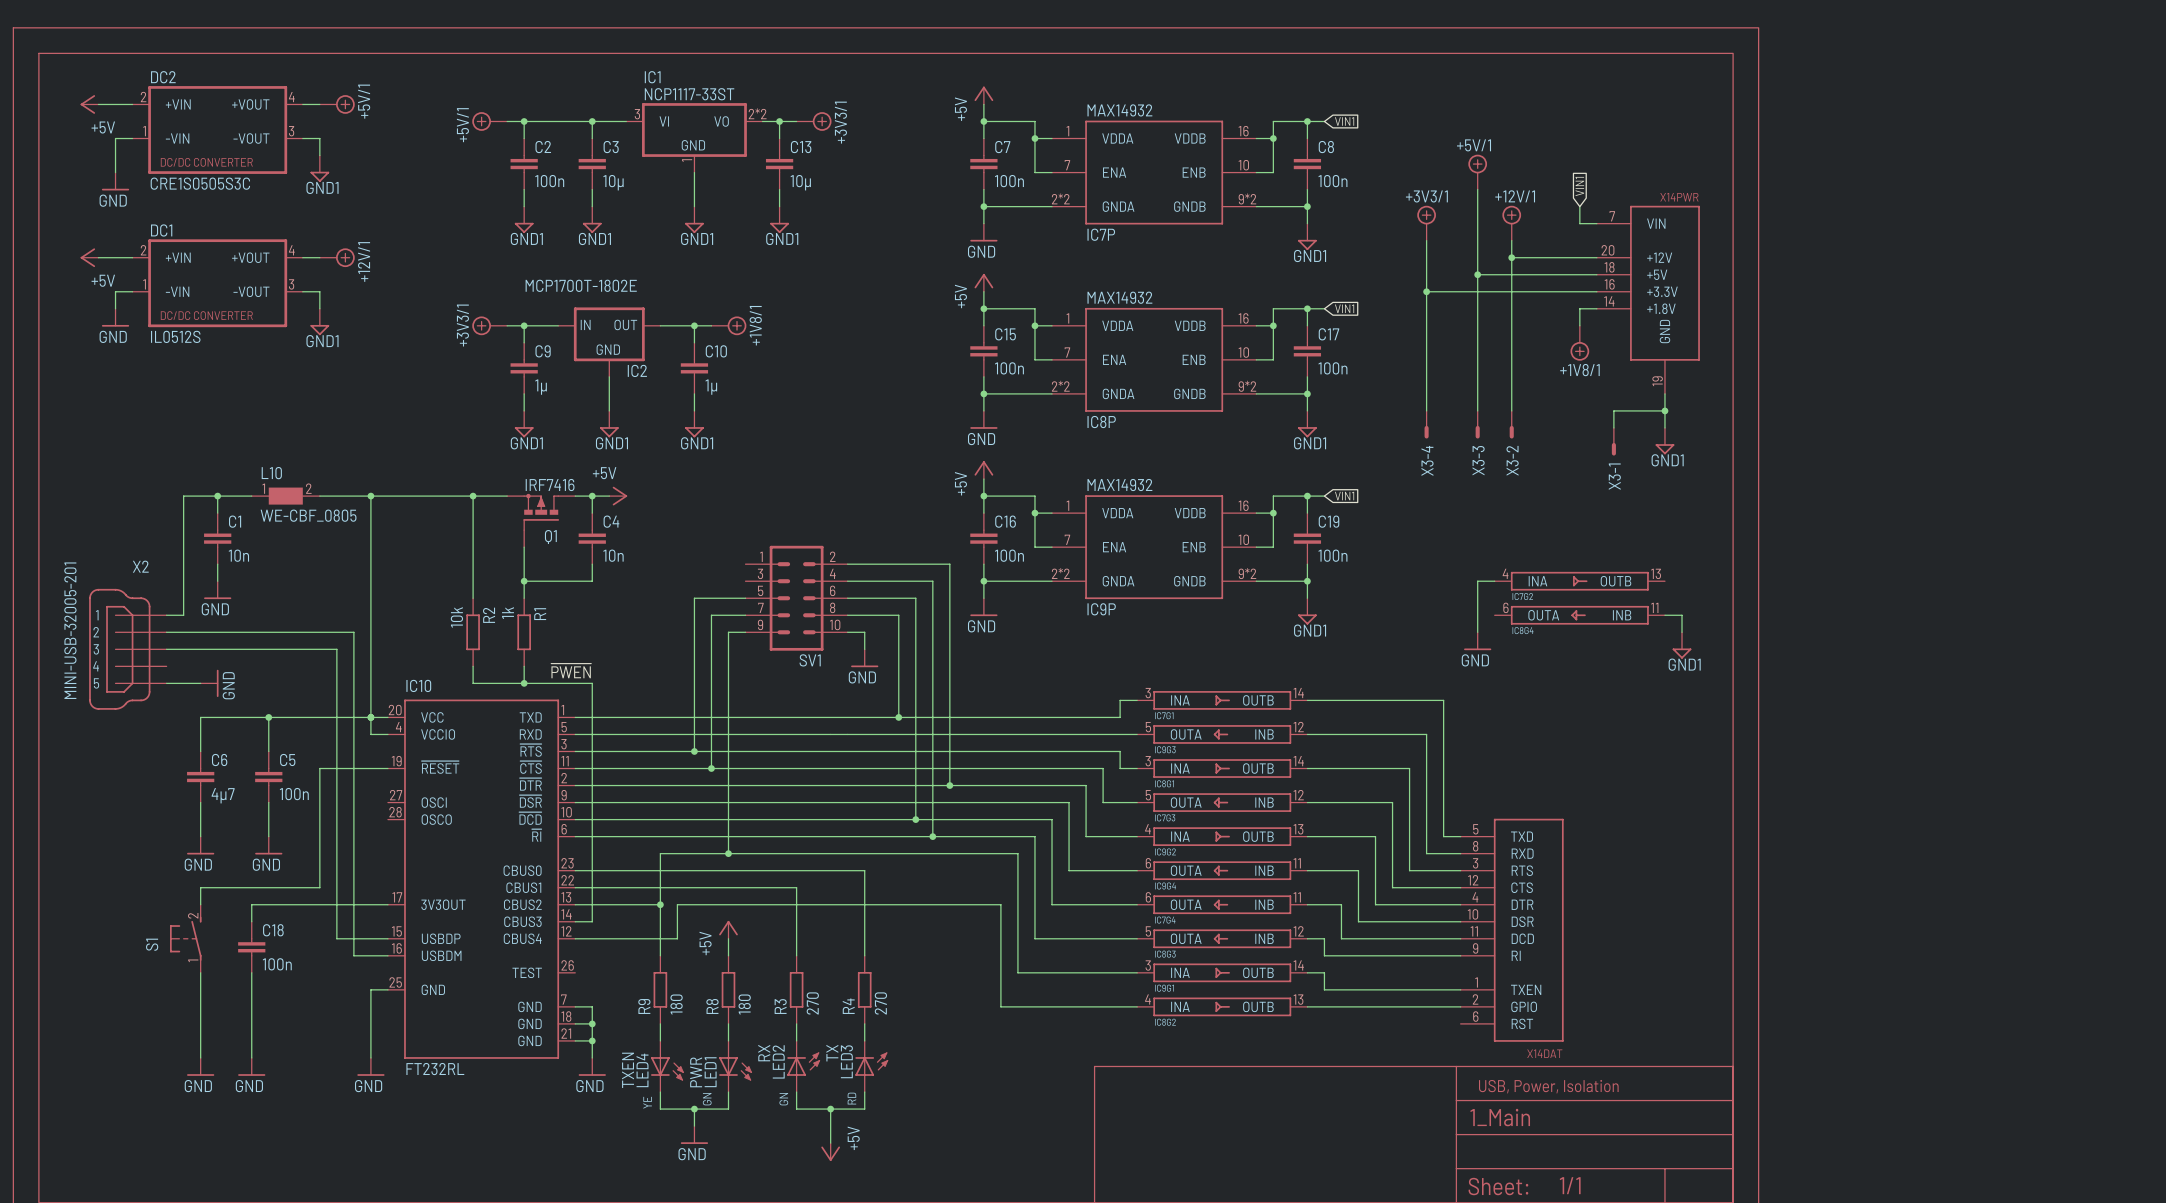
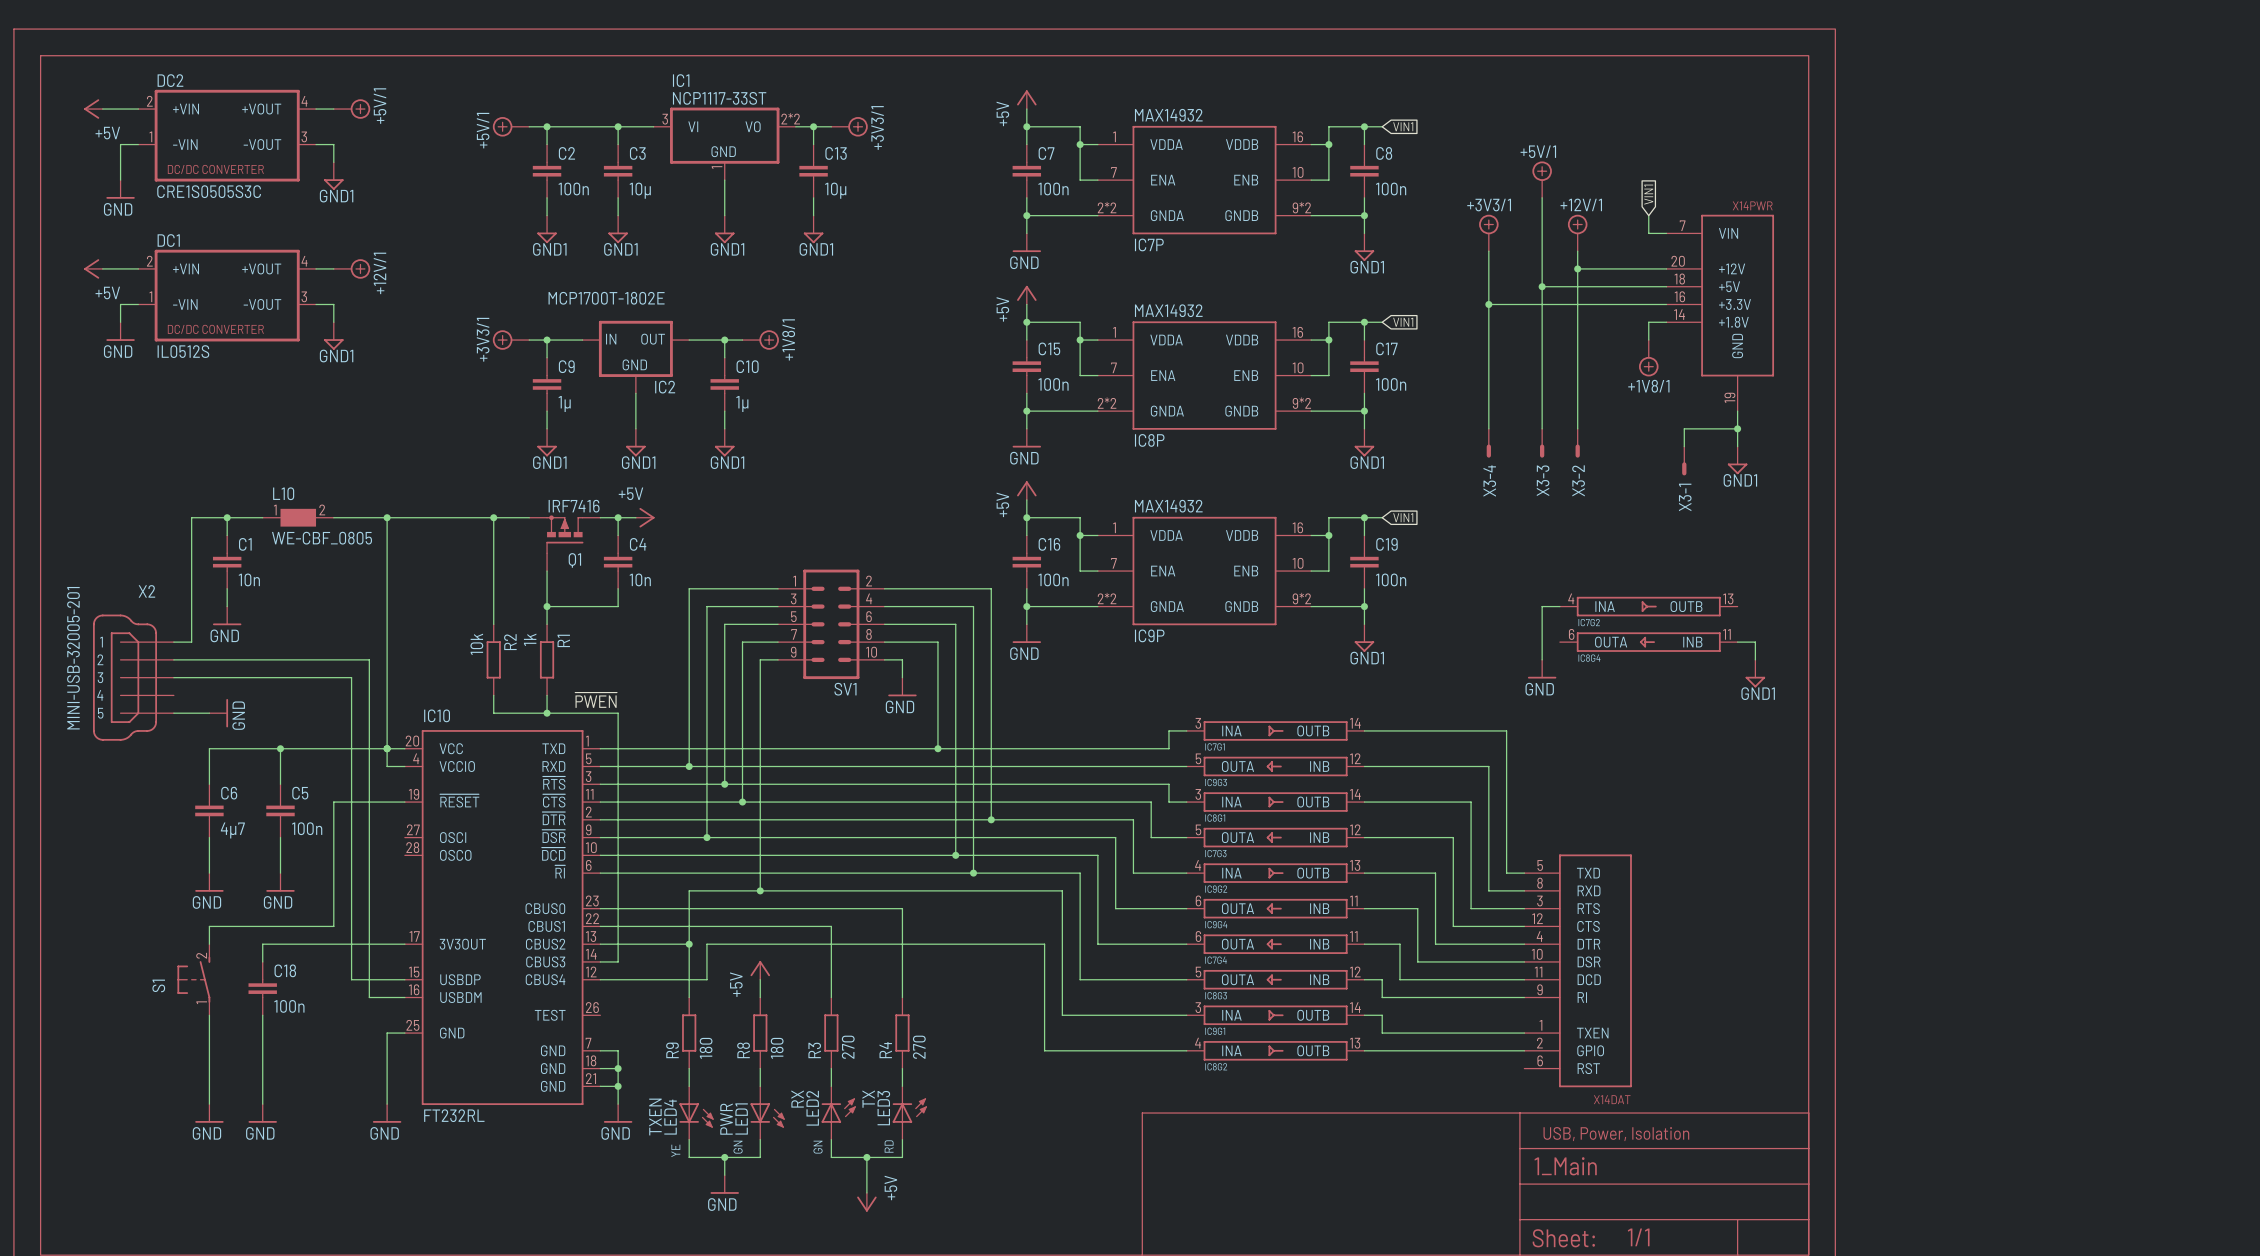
wire: none -> (778, 588) (689, 588) (689, 766)
wire: none -> (778, 606) (706, 606) (706, 837)
junction: none -> (689, 766)
junction: none -> (706, 837)

